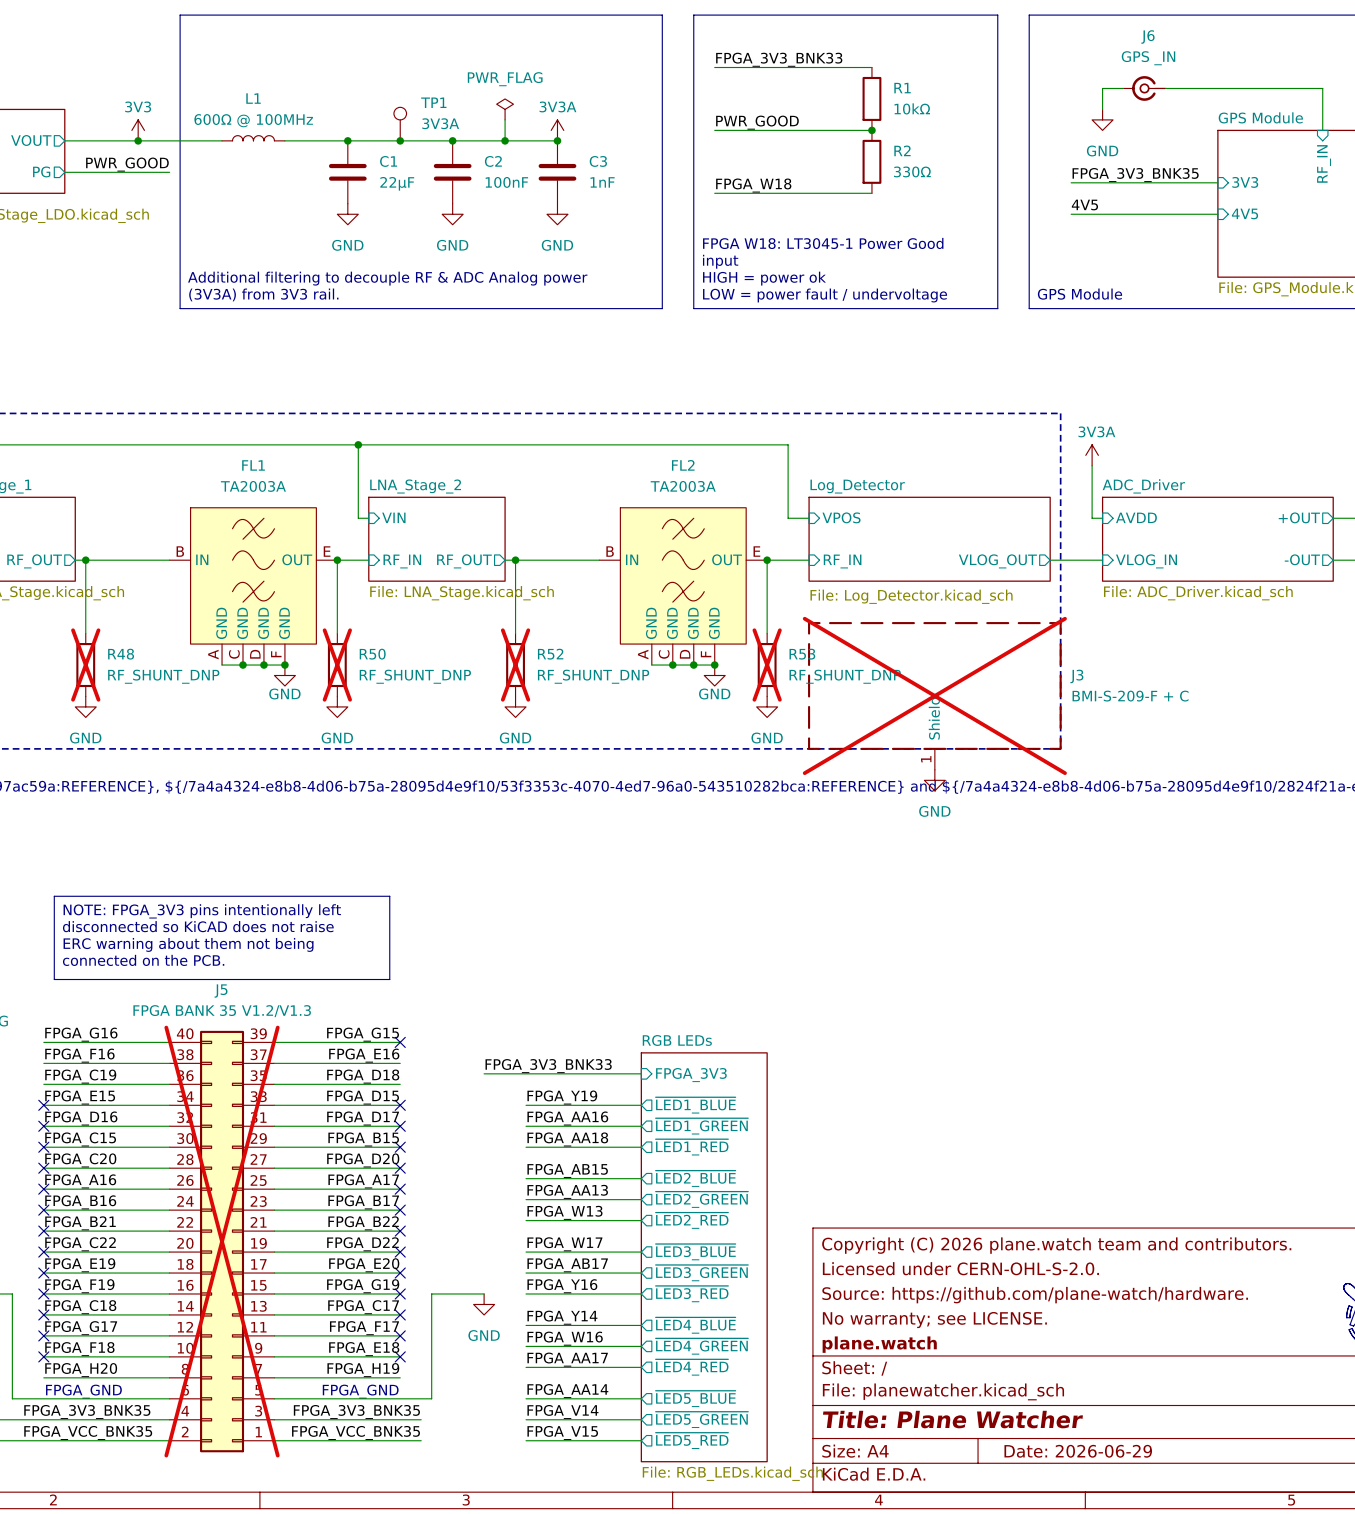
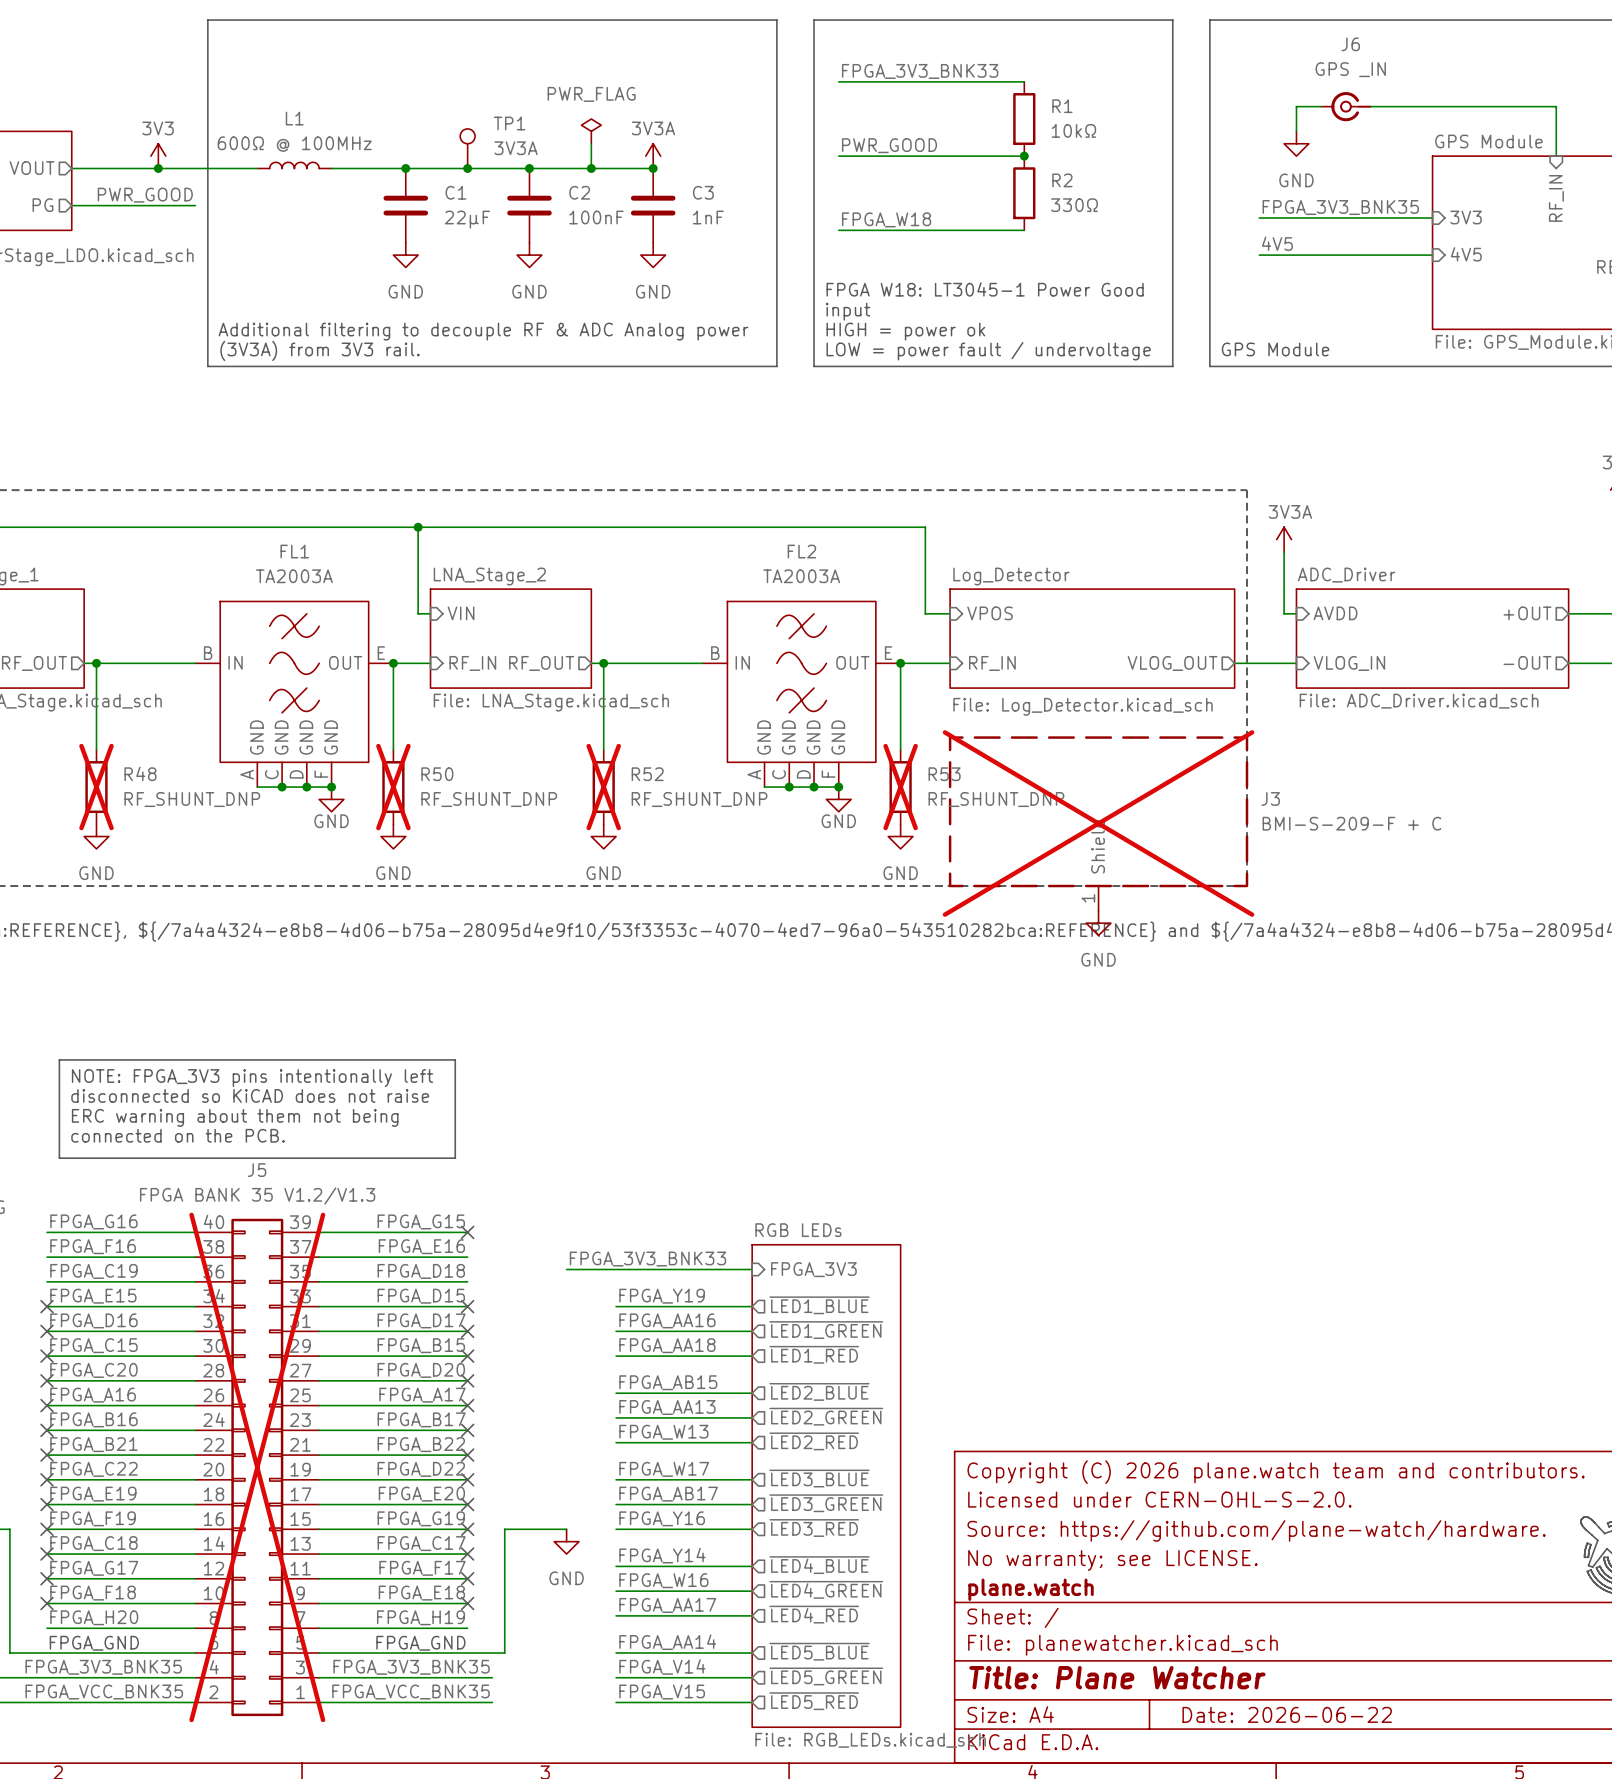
title block: Date: 2026-06-29 (1078, 1451) -> Date: 2026-06-22 (1287, 1714)

